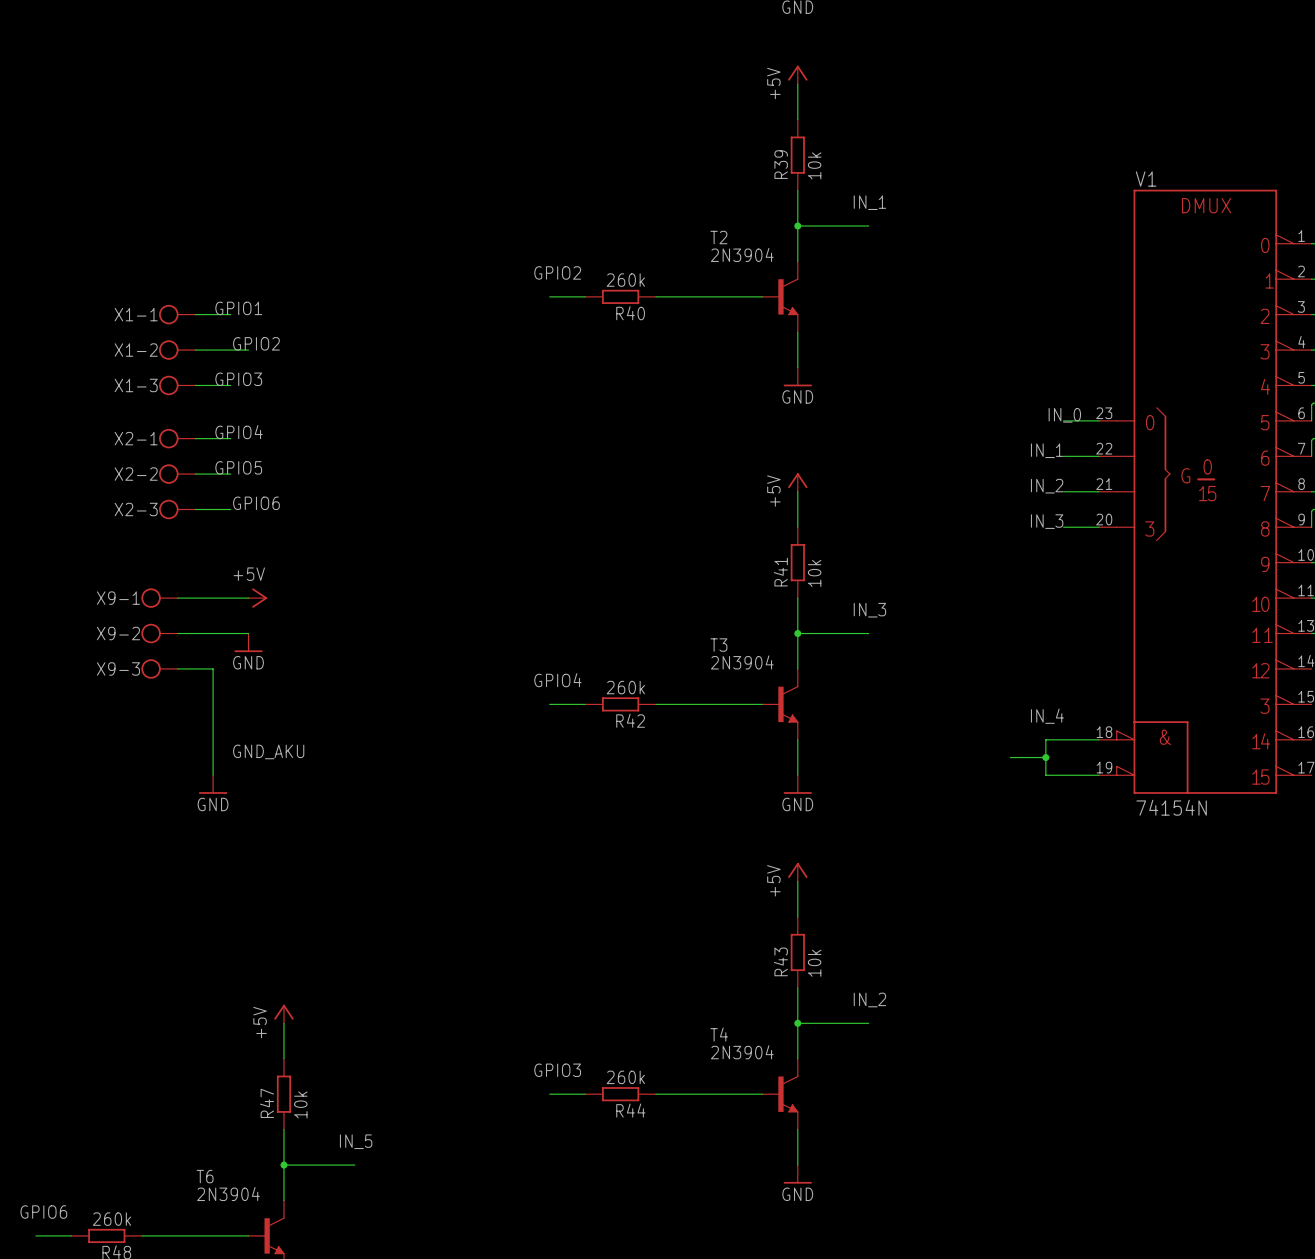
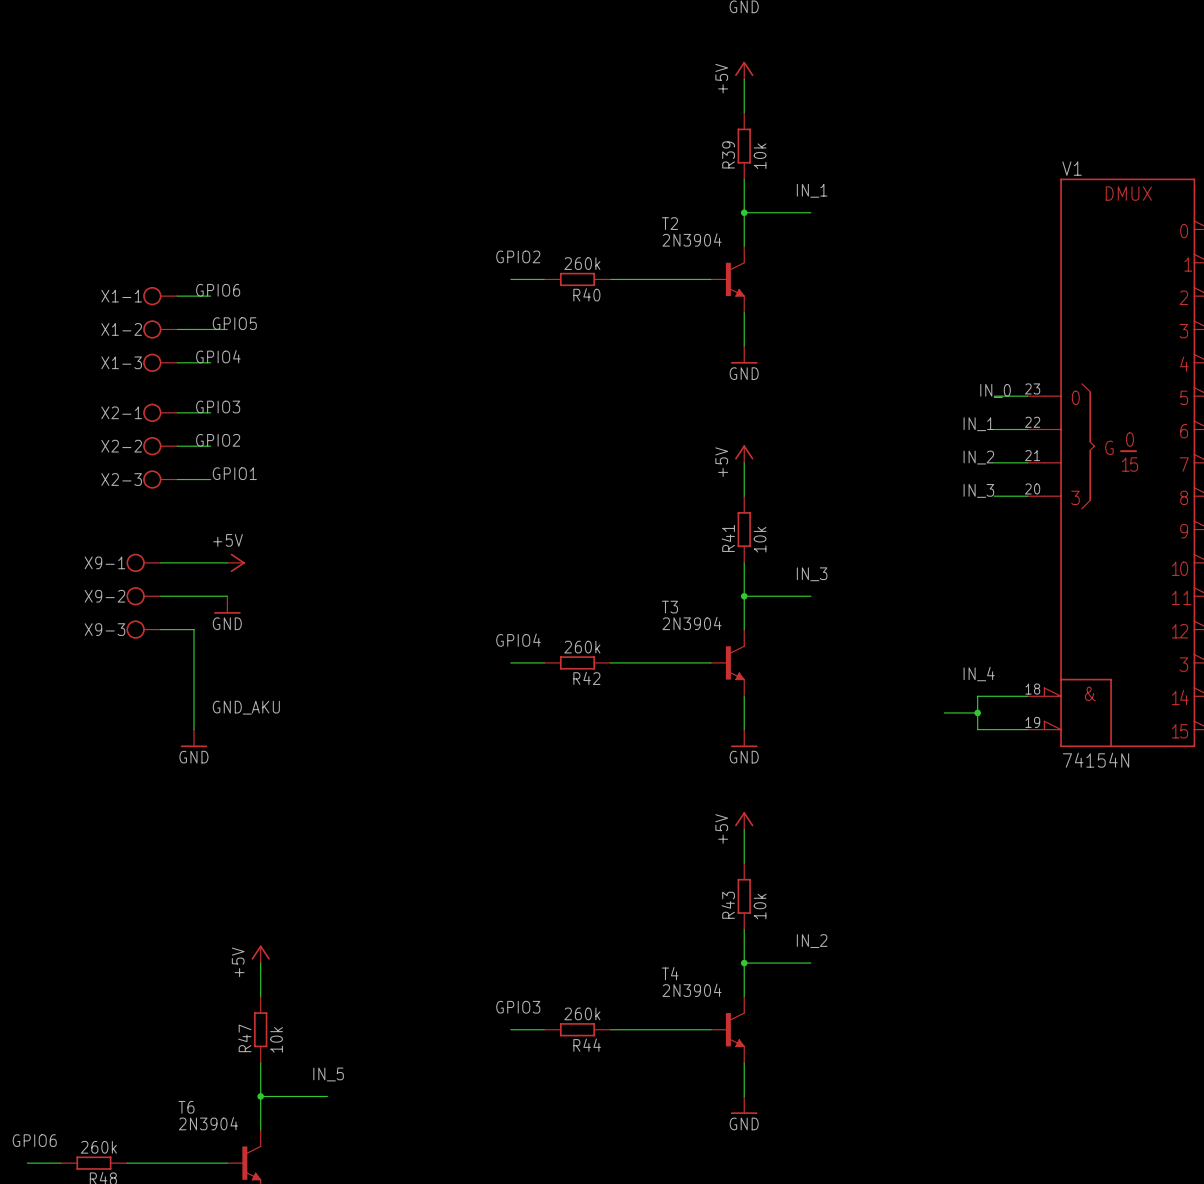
label: GPIO1 (238, 308) -> GPIO6 (218, 290)
label: GPIO2 (256, 343) -> GPIO5 (234, 323)
label: GPIO3 (238, 379) -> GPIO4 (218, 356)
label: GPIO4 (239, 432) -> GPIO3 (218, 406)
label: GPIO5 (238, 467) -> GPIO2 (218, 440)
label: GPIO6 (256, 503) -> GPIO1 (234, 473)

